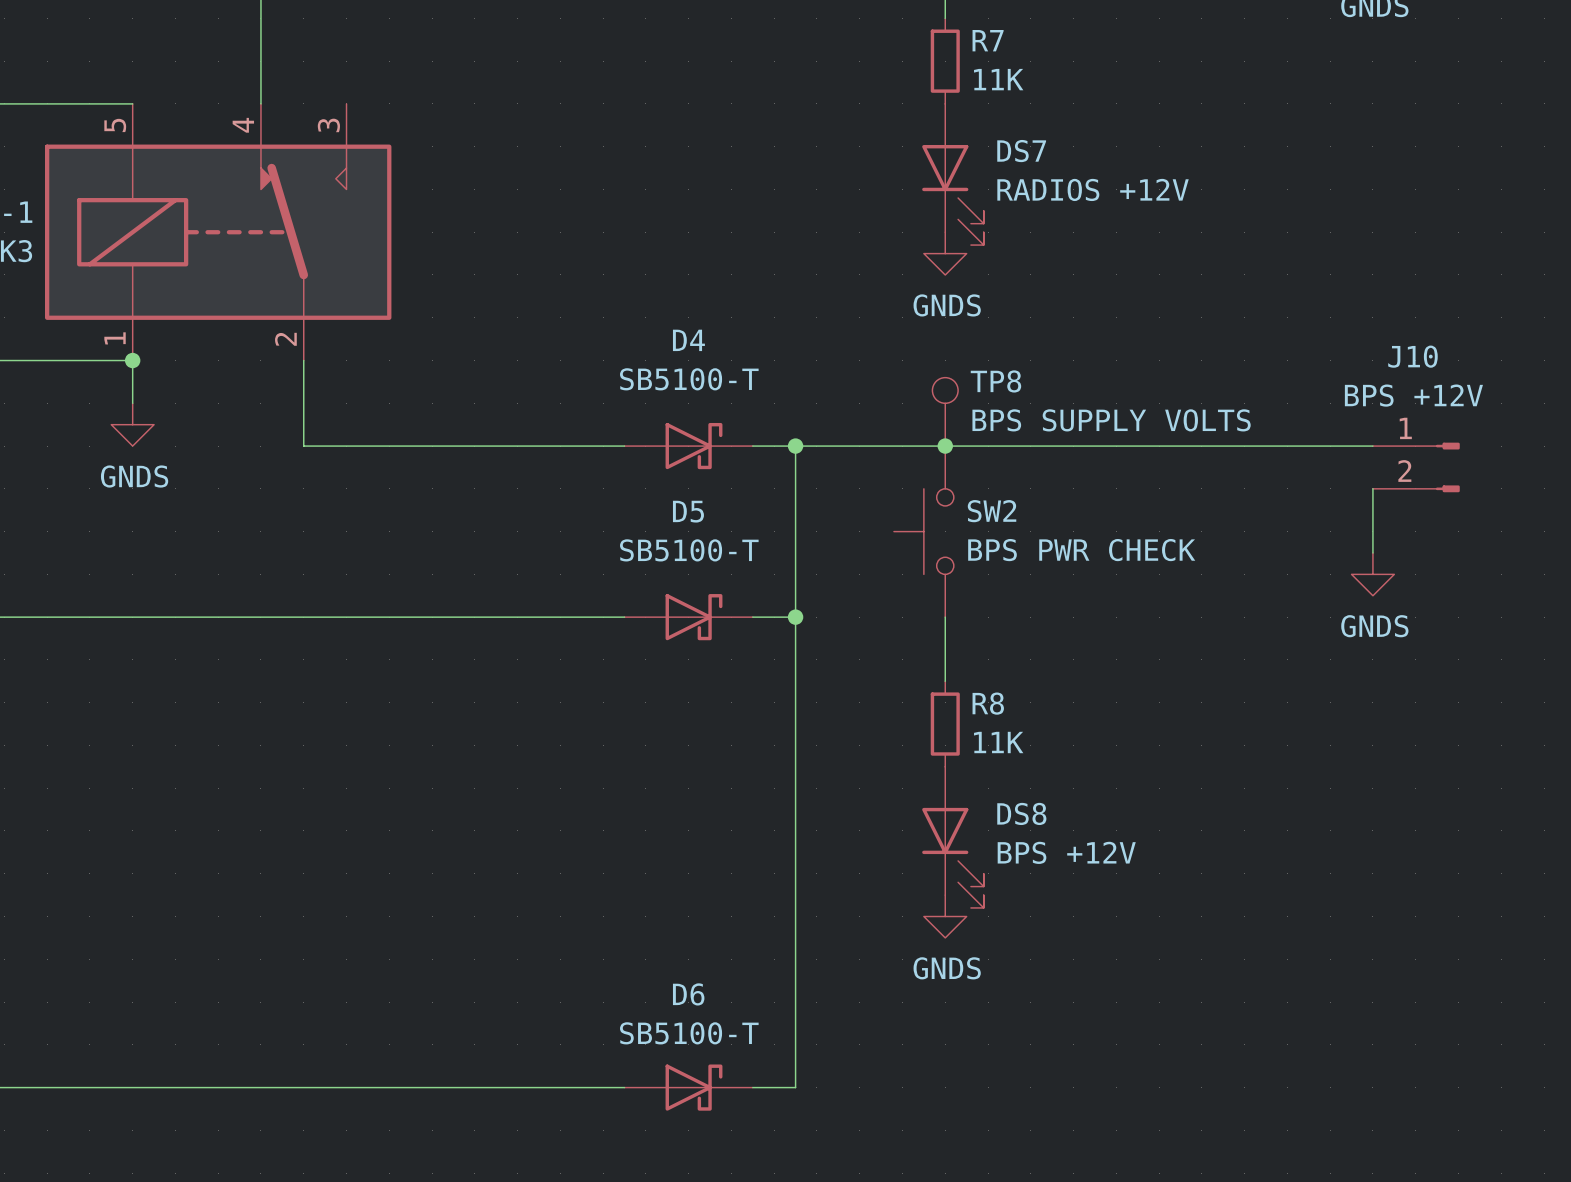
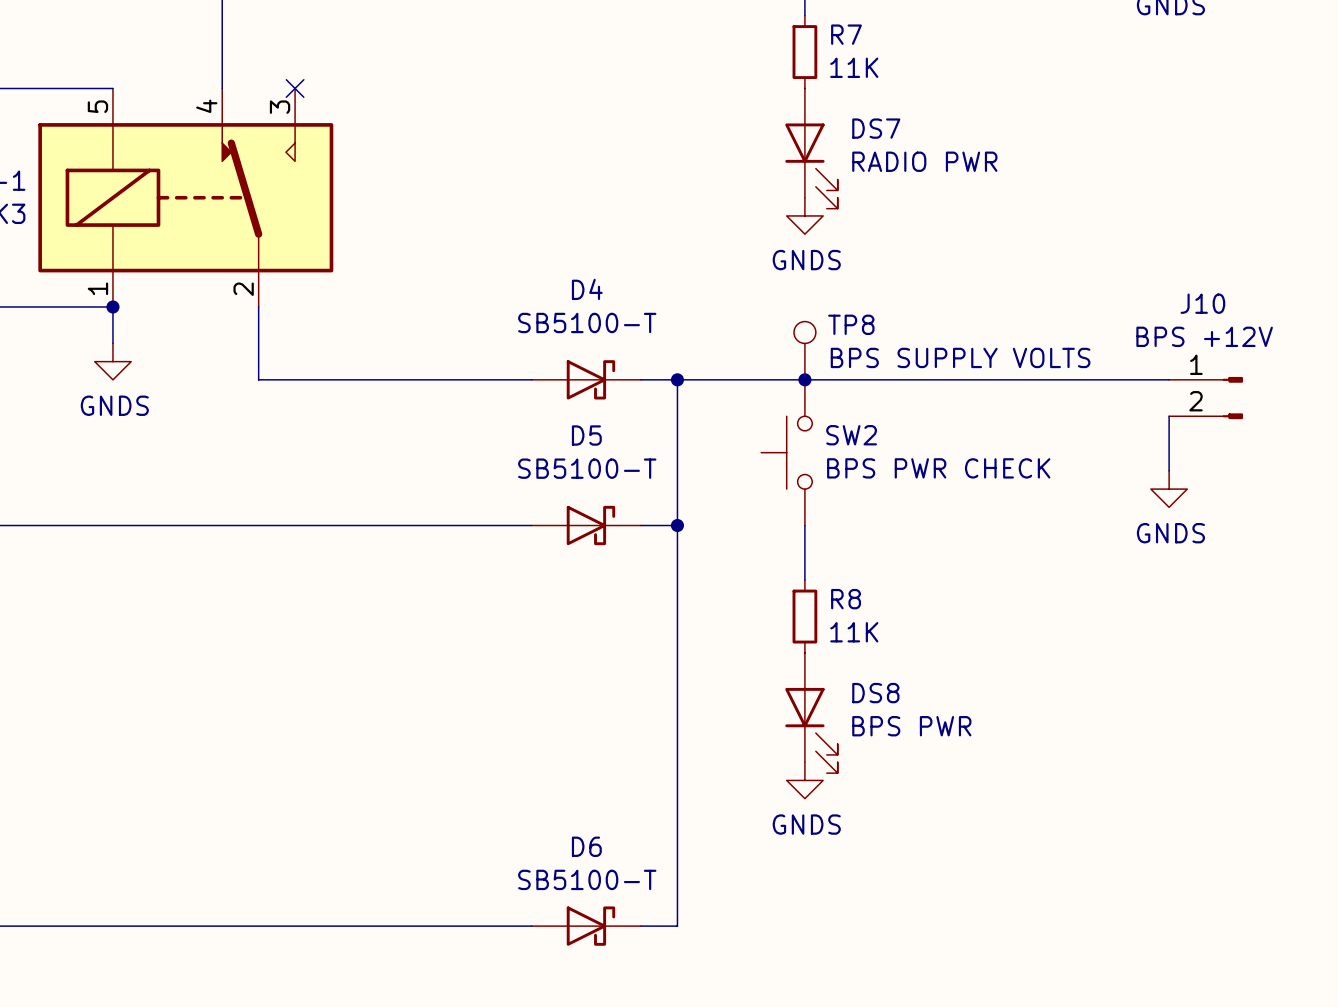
no-connect mark: none -> (295, 88)
DS7 value: RADIOS +12V (1093, 189) -> RADIO PWR (924, 161)
DS8 value: BPS +12V (1066, 852) -> BPS PWR (911, 726)

